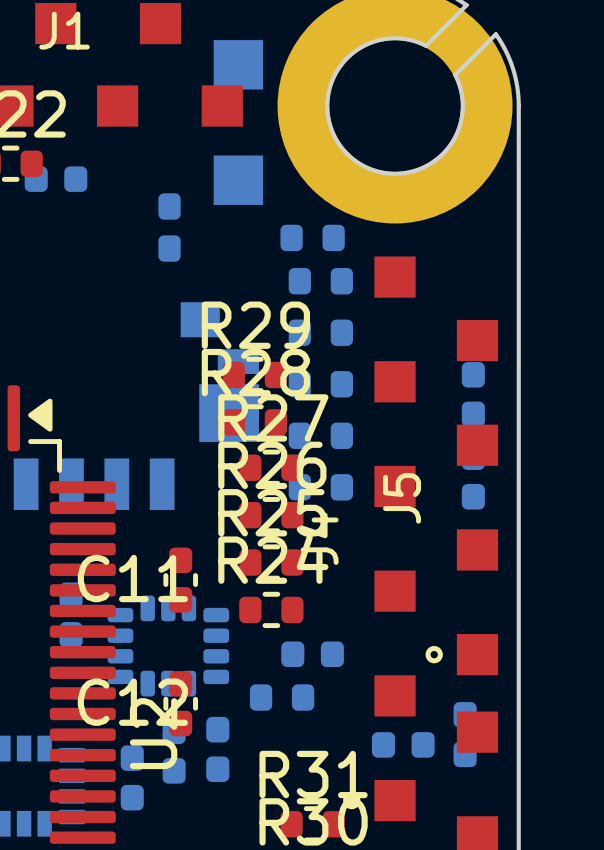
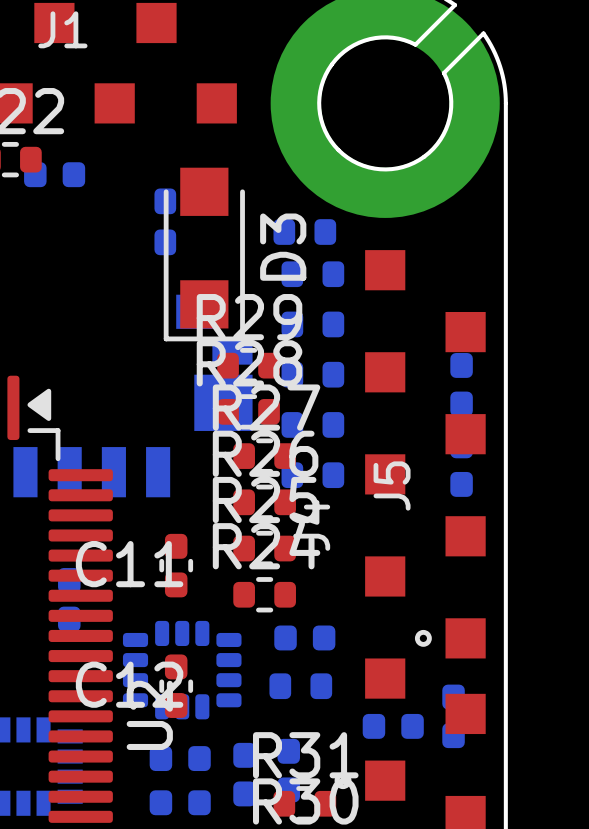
D3 side: bottom (238, 122) -> top (204, 254)
part position: (168, 646) -> (182, 670)
part position: (282, 697) -> (300, 686)
part: (217, 749) -> none
part: (174, 751) -> none
part: (132, 777) -> none
part: none -> (180, 758)
part: none -> (288, 770)
part: none -> (244, 774)
part: none -> (180, 802)

